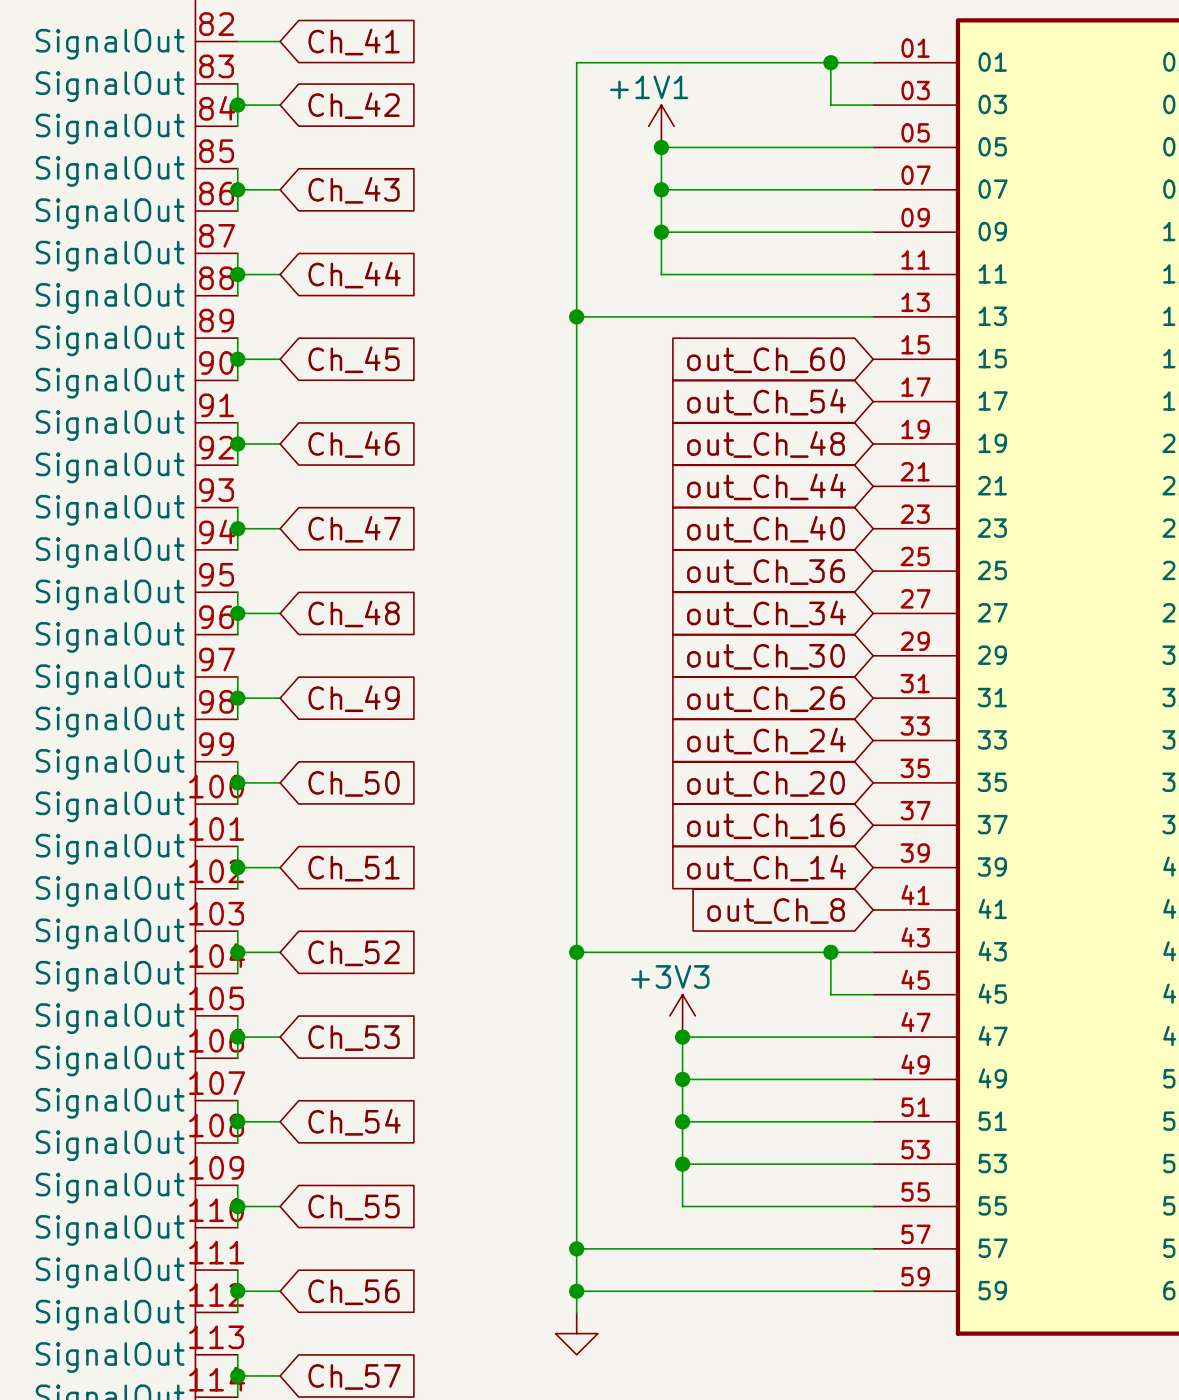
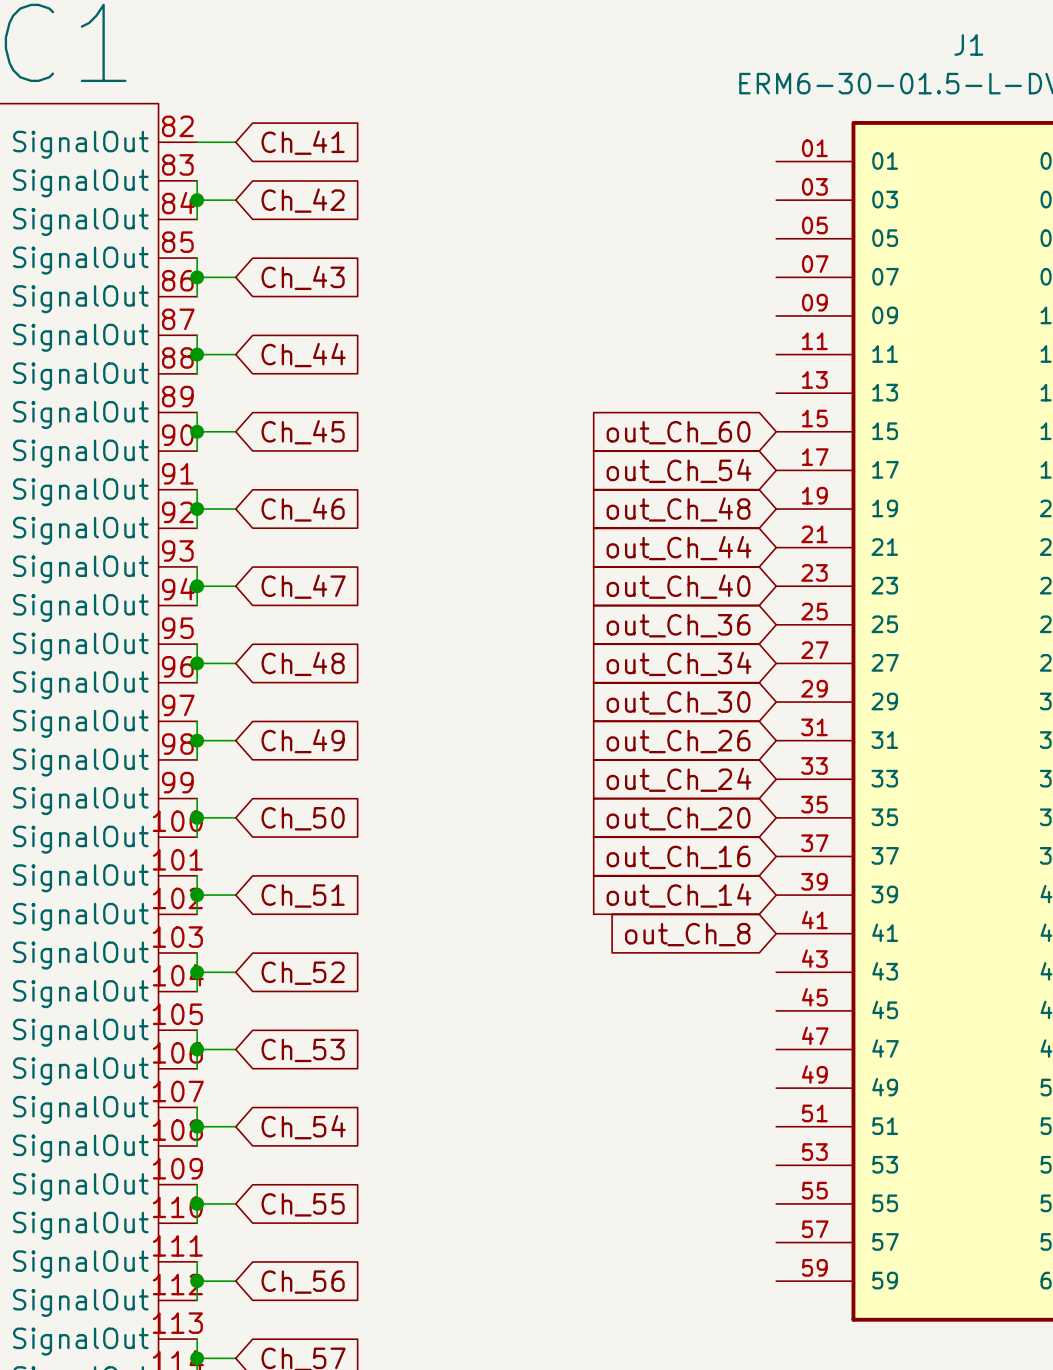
wire: (830, 62) (830, 105) (873, 105) -> none
junction: (830, 62) -> none
wire: (873, 62) (576, 62) (576, 1312) -> none
power symbol: +1V1 (661, 126) -> none
junction: (661, 147) -> none
wire: (873, 147) (661, 147) (661, 274) (873, 274) -> none
wire: (661, 189) (873, 189) -> none
junction: (661, 189) -> none
wire: (661, 232) (873, 232) -> none
junction: (661, 232) -> none
wire: (576, 316) (873, 316) -> none
junction: (576, 316) -> none
wire: (576, 952) (873, 952) -> none
junction: (576, 952) -> none
wire: (830, 952) (830, 994) (873, 994) -> none
junction: (830, 952) -> none
power symbol: +3V3 (682, 1015) -> none
junction: (682, 1037) -> none
wire: (873, 1037) (682, 1037) (682, 1206) (873, 1206) -> none
wire: (682, 1079) (873, 1079) -> none
junction: (682, 1079) -> none
wire: (682, 1121) (873, 1121) -> none
junction: (682, 1121) -> none
wire: (682, 1164) (873, 1164) -> none
junction: (682, 1164) -> none
wire: (576, 1248) (873, 1248) -> none
junction: (576, 1248) -> none
wire: (576, 1291) (873, 1291) -> none
junction: (576, 1291) -> none
power symbol: (576, 1333) -> none

